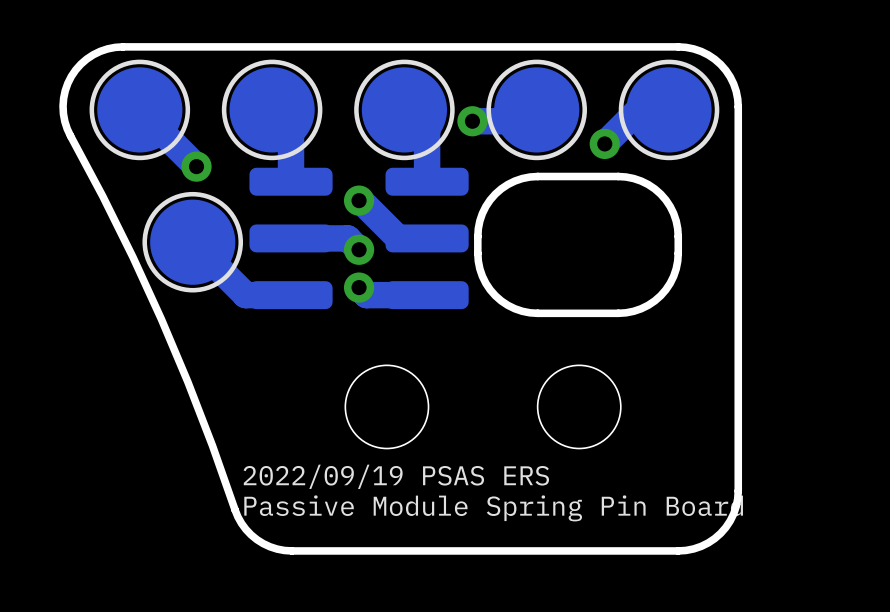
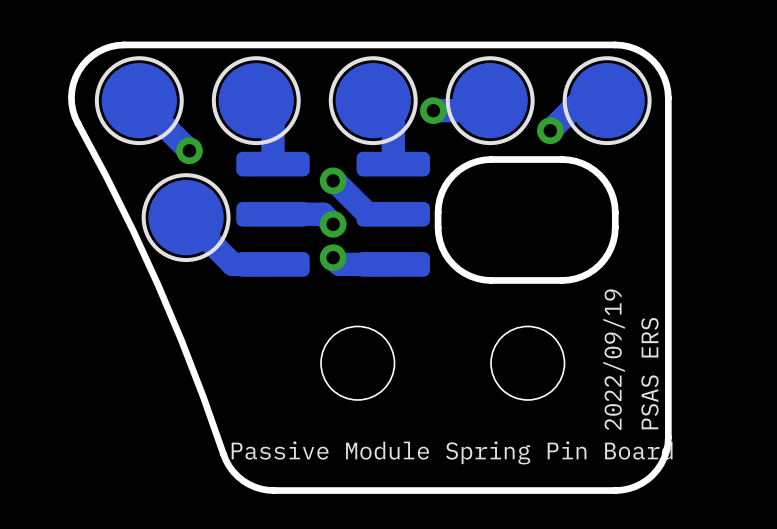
text: none -> 2022/09/19 (614, 359)
text: none -> PSAS ERS (649, 373)
text: 2022/09/19 PSAS ERS (396, 476) -> none

